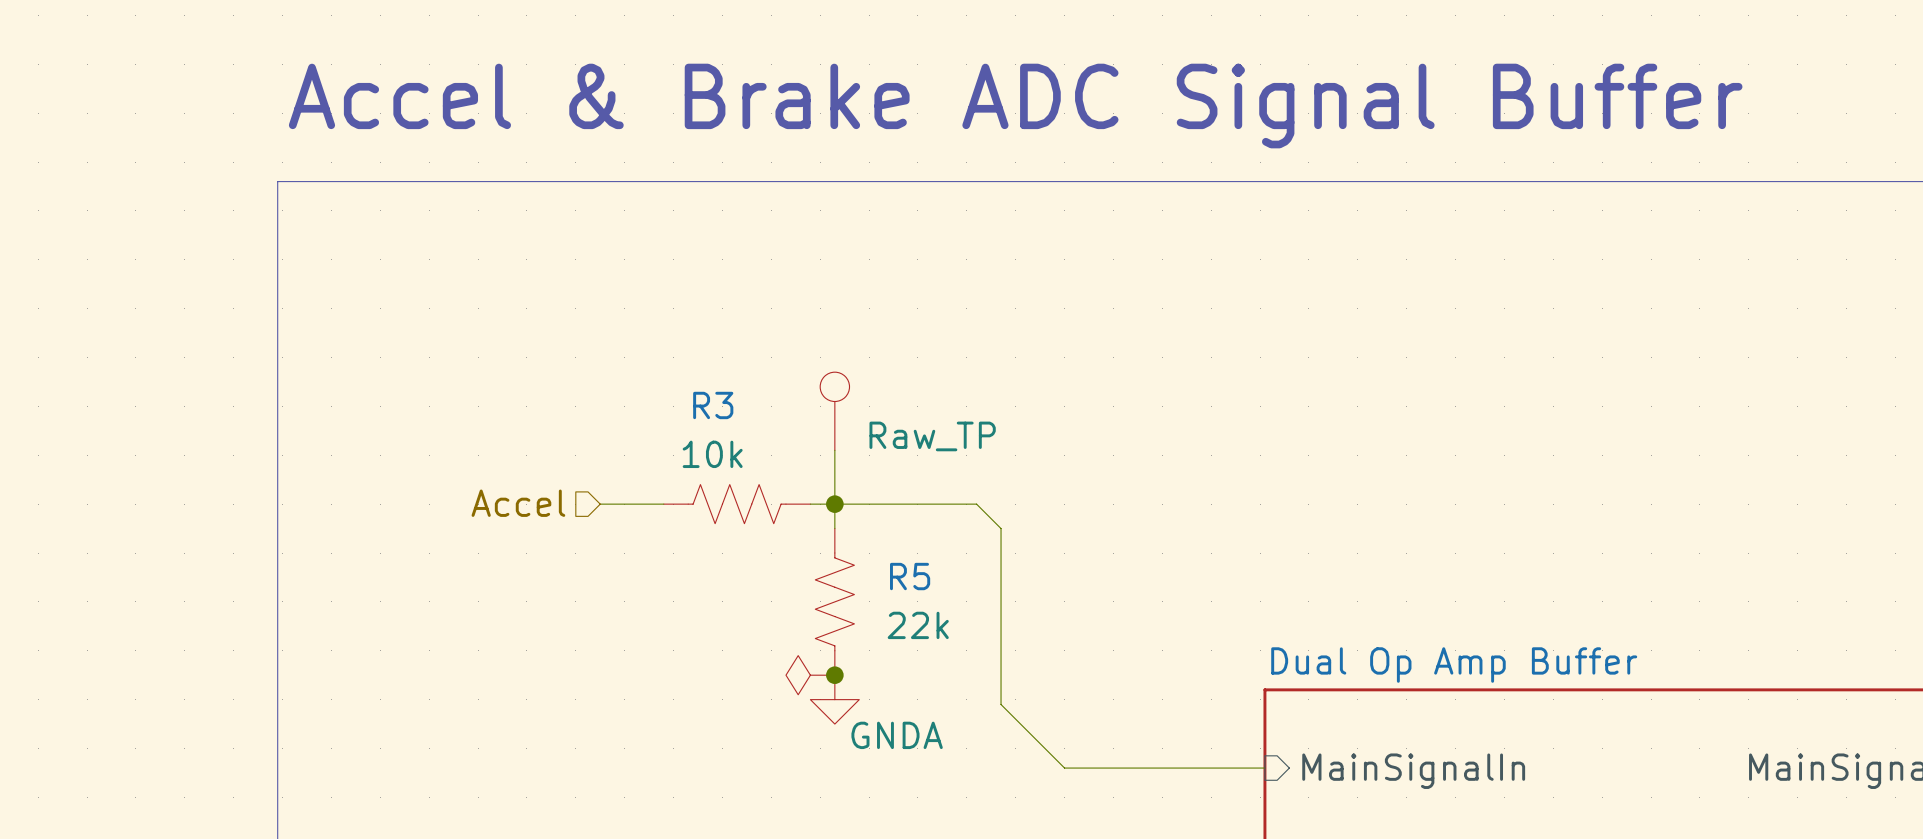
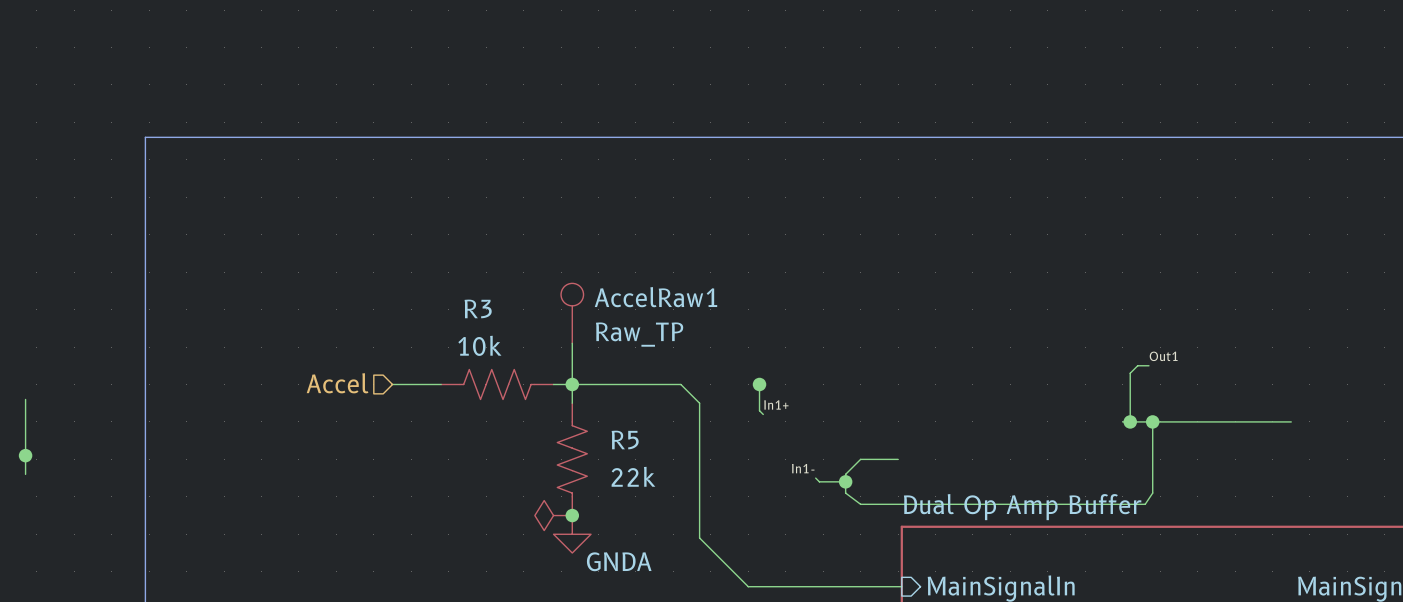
text: Accel & Brake ADC Signal Buffer (1015, 106) -> none
AccelRaw1 name: none -> AccelRaw1 (655, 297)
label: none -> Out1 (1163, 356)
wire: none -> (1148, 365) (1137, 365) (1130, 373) (1130, 421)
wire: none -> (759, 384) (759, 410) (763, 414)
junction: none -> (759, 384)
wire: none -> (25, 399) (25, 474)
label: none -> In1+ (776, 404)
wire: none -> (1122, 421) (1291, 421)
junction: none -> (1130, 421)
wire: none -> (1152, 421) (1152, 493) (1145, 504) (860, 504) (845, 493) (845, 474) (860, 459) (898, 459)
junction: none -> (1152, 421)
junction: none -> (25, 455)
label: none -> In1- (803, 468)
wire: none -> (815, 478) (819, 481) (845, 481)
junction: none -> (845, 481)

